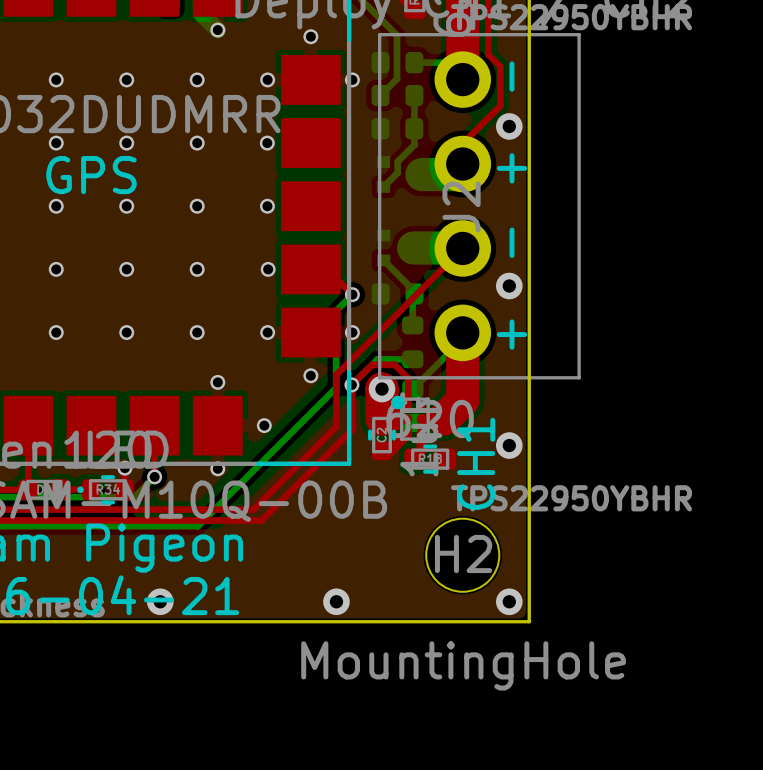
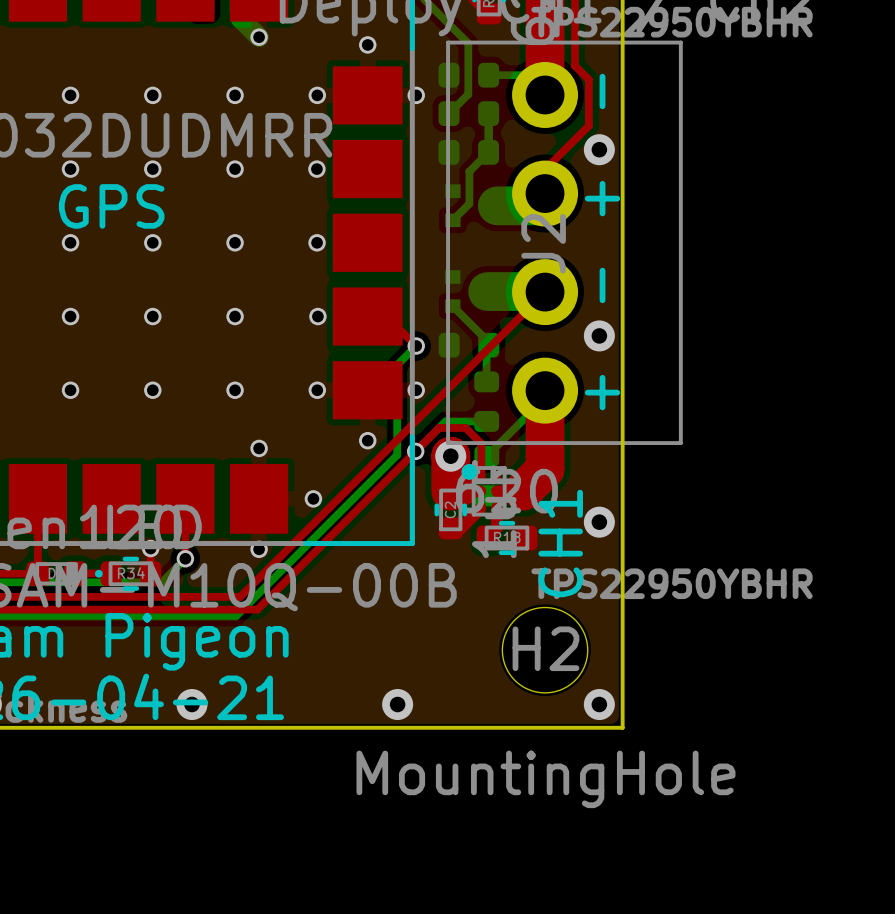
bottom track: (414, 128) (414, 145) (397, 161) (397, 172) -> (488, 113) (488, 152) (469, 171) (469, 203)
top track: (336, 374) (336, 426) (253, 509) (201, 509) -> (397, 439) (240, 596)
top track: (351, 384) (351, 430) (261, 520) (216, 520) -> (415, 451) (257, 609)

